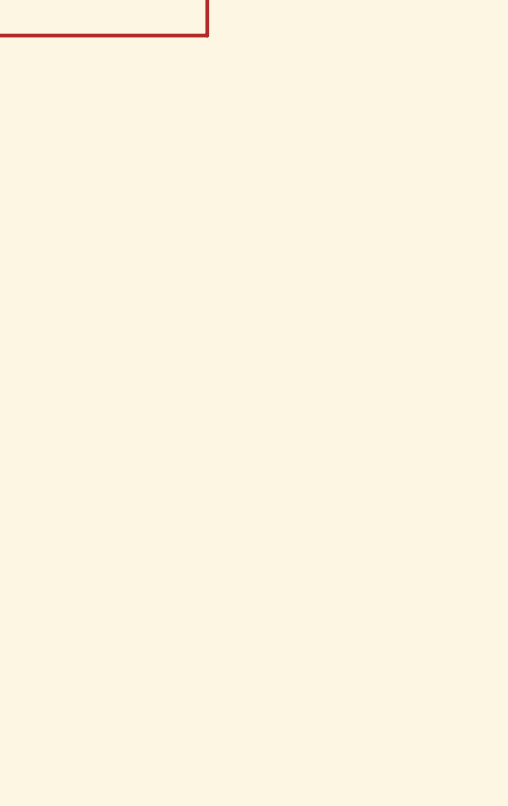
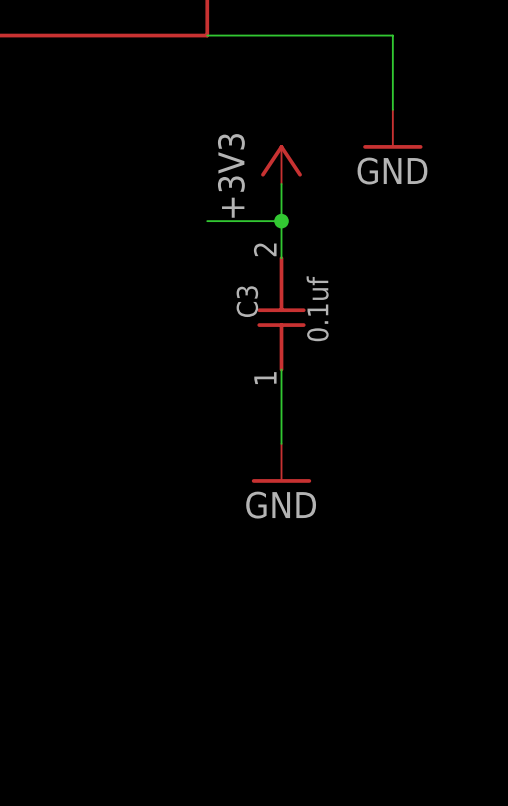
wire: none -> (207, 35) (392, 35) (392, 109)
power symbol: none -> GND (392, 129)
power symbol: none -> +3V3 (281, 164)
wire: none -> (281, 184) (281, 258)
wire: none -> (207, 221) (281, 221)
junction: none -> (281, 221)
C3: none -> 0.1uf (281, 313)
wire: none -> (281, 369) (281, 443)
power symbol: none -> GND (281, 463)

